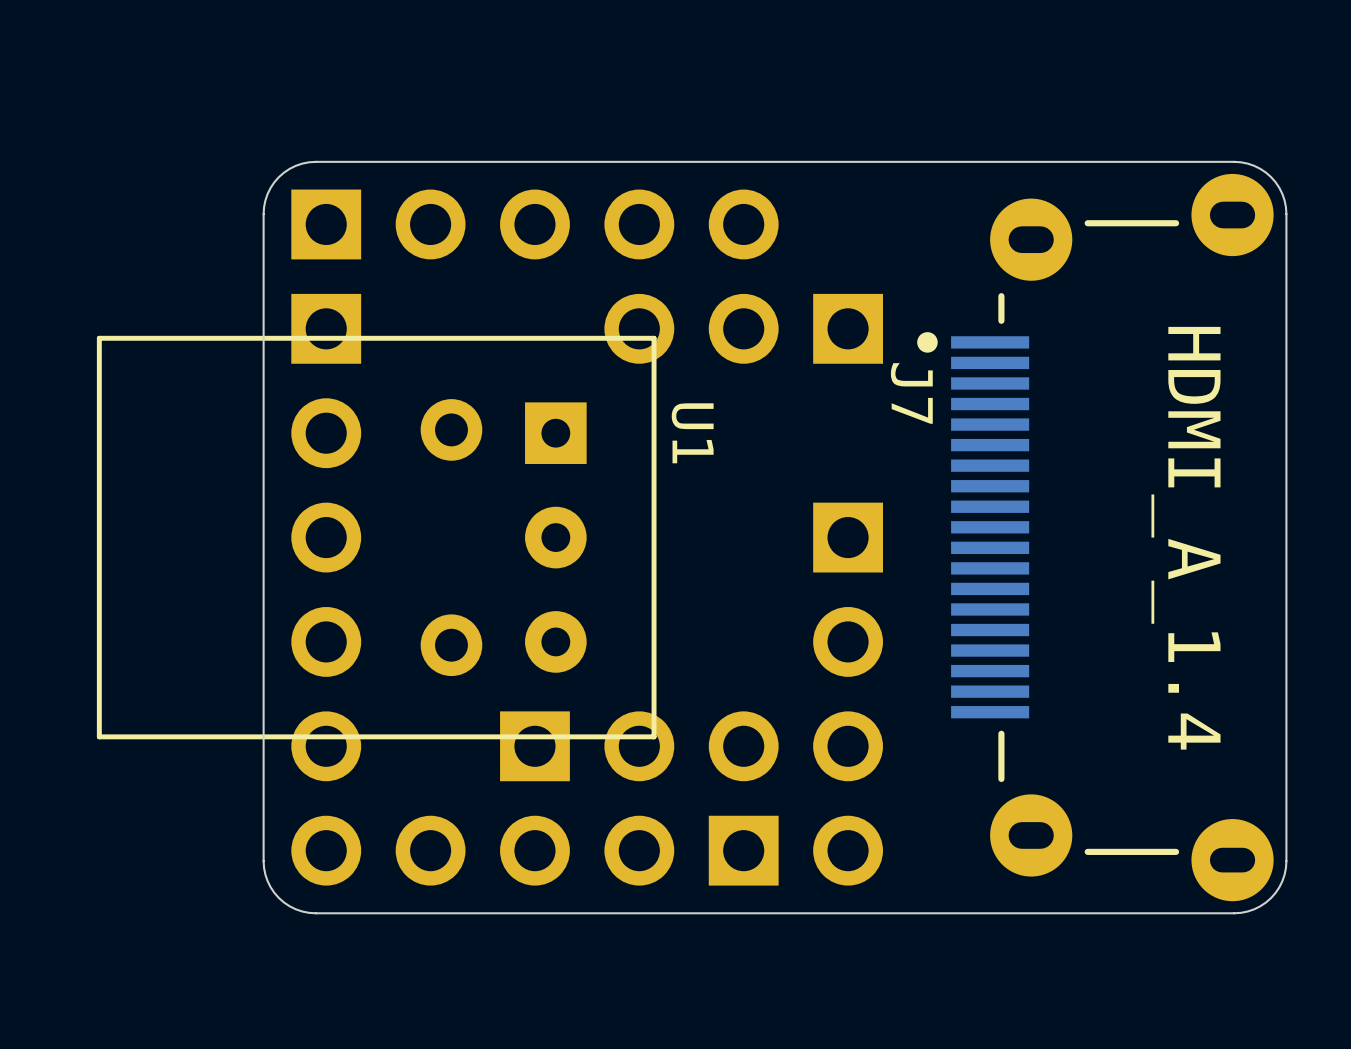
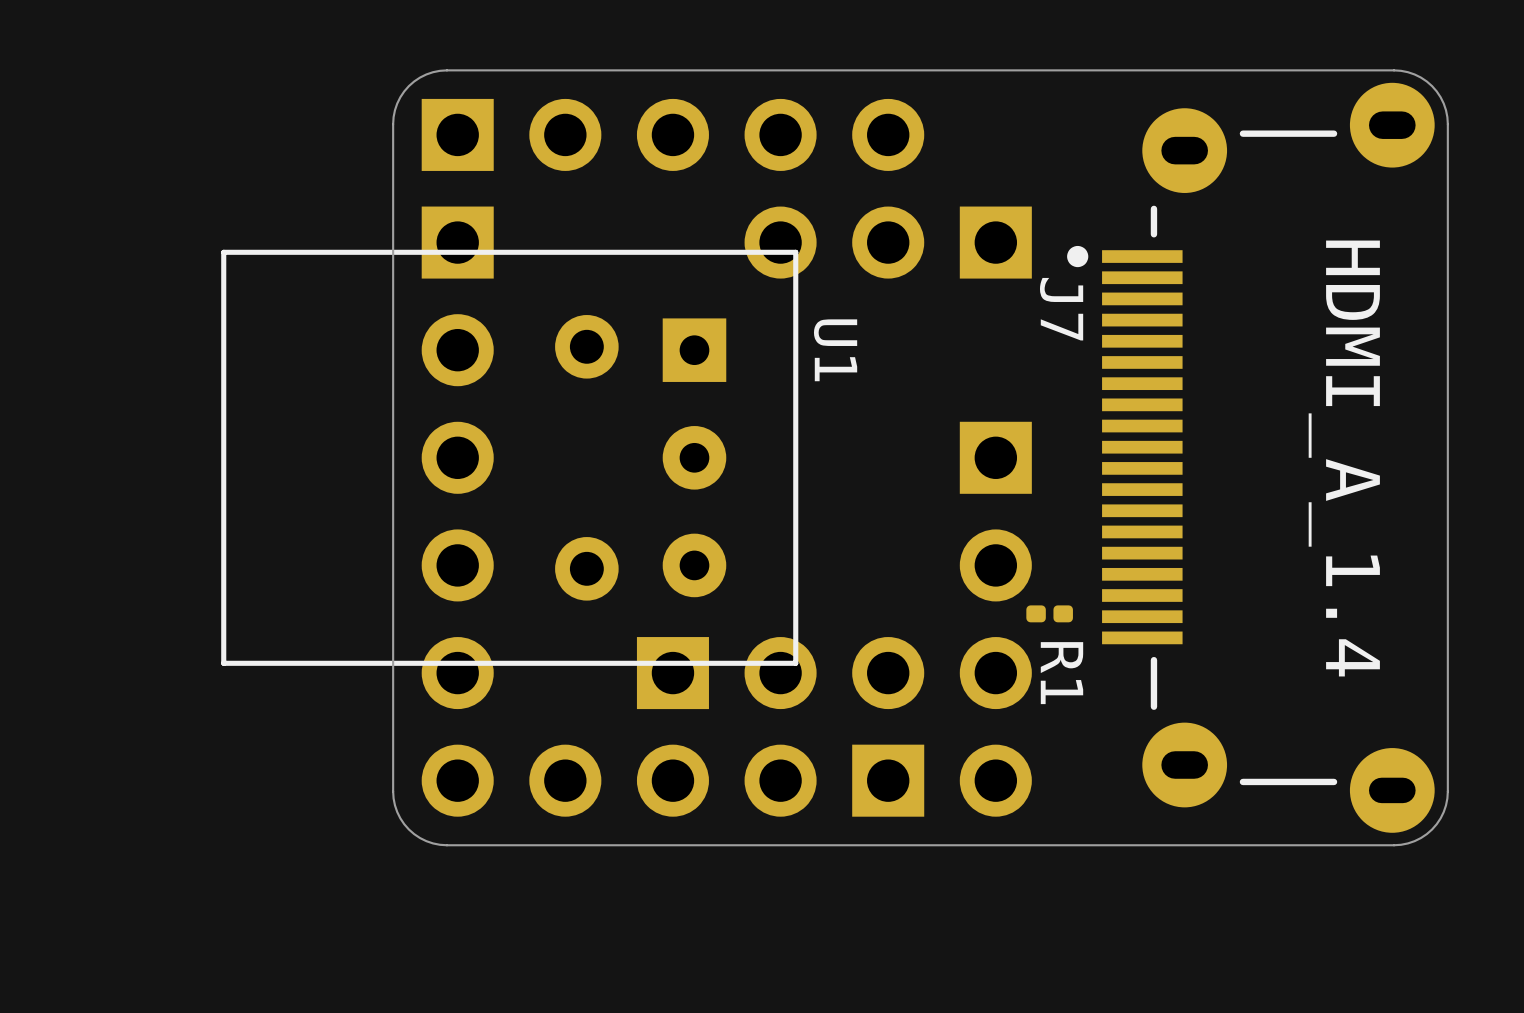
R1: none -> (1049, 613)

